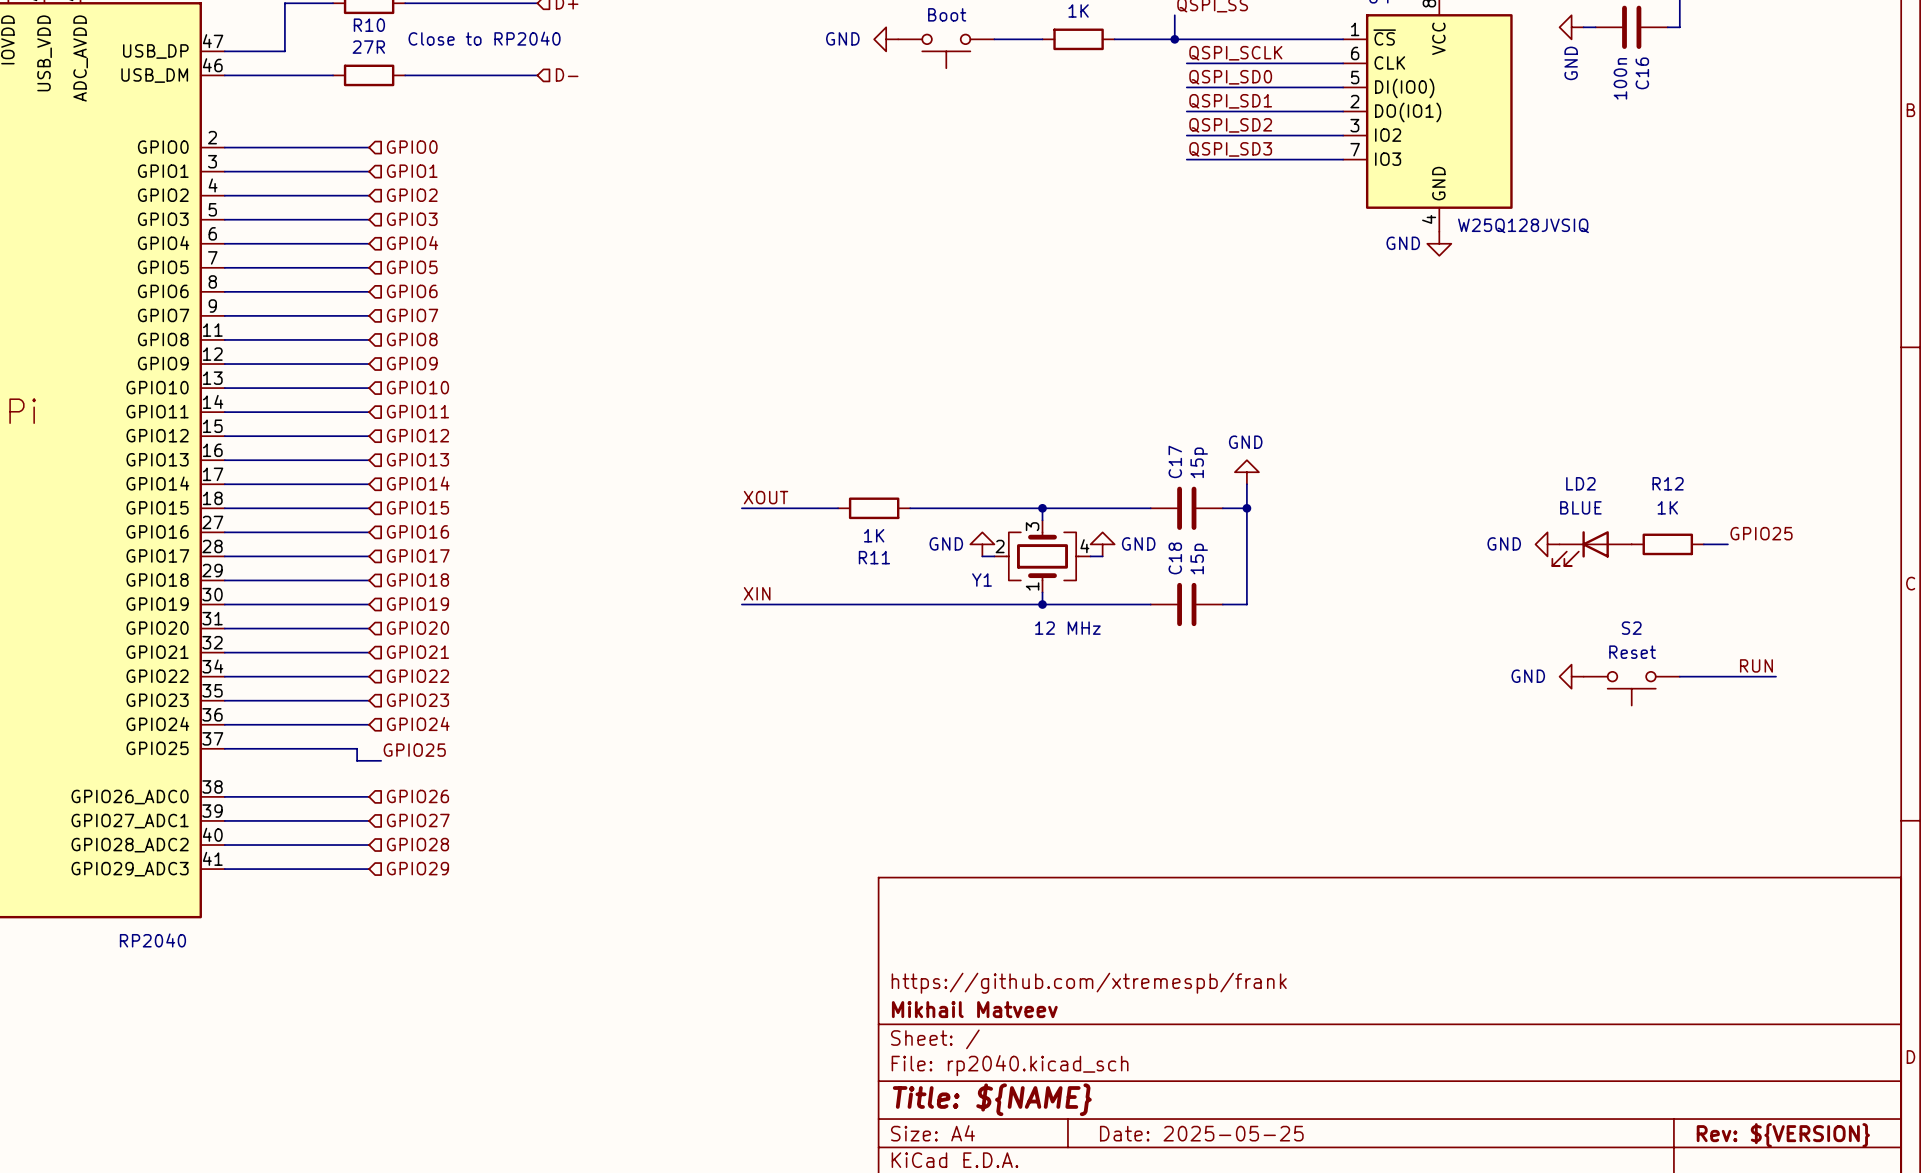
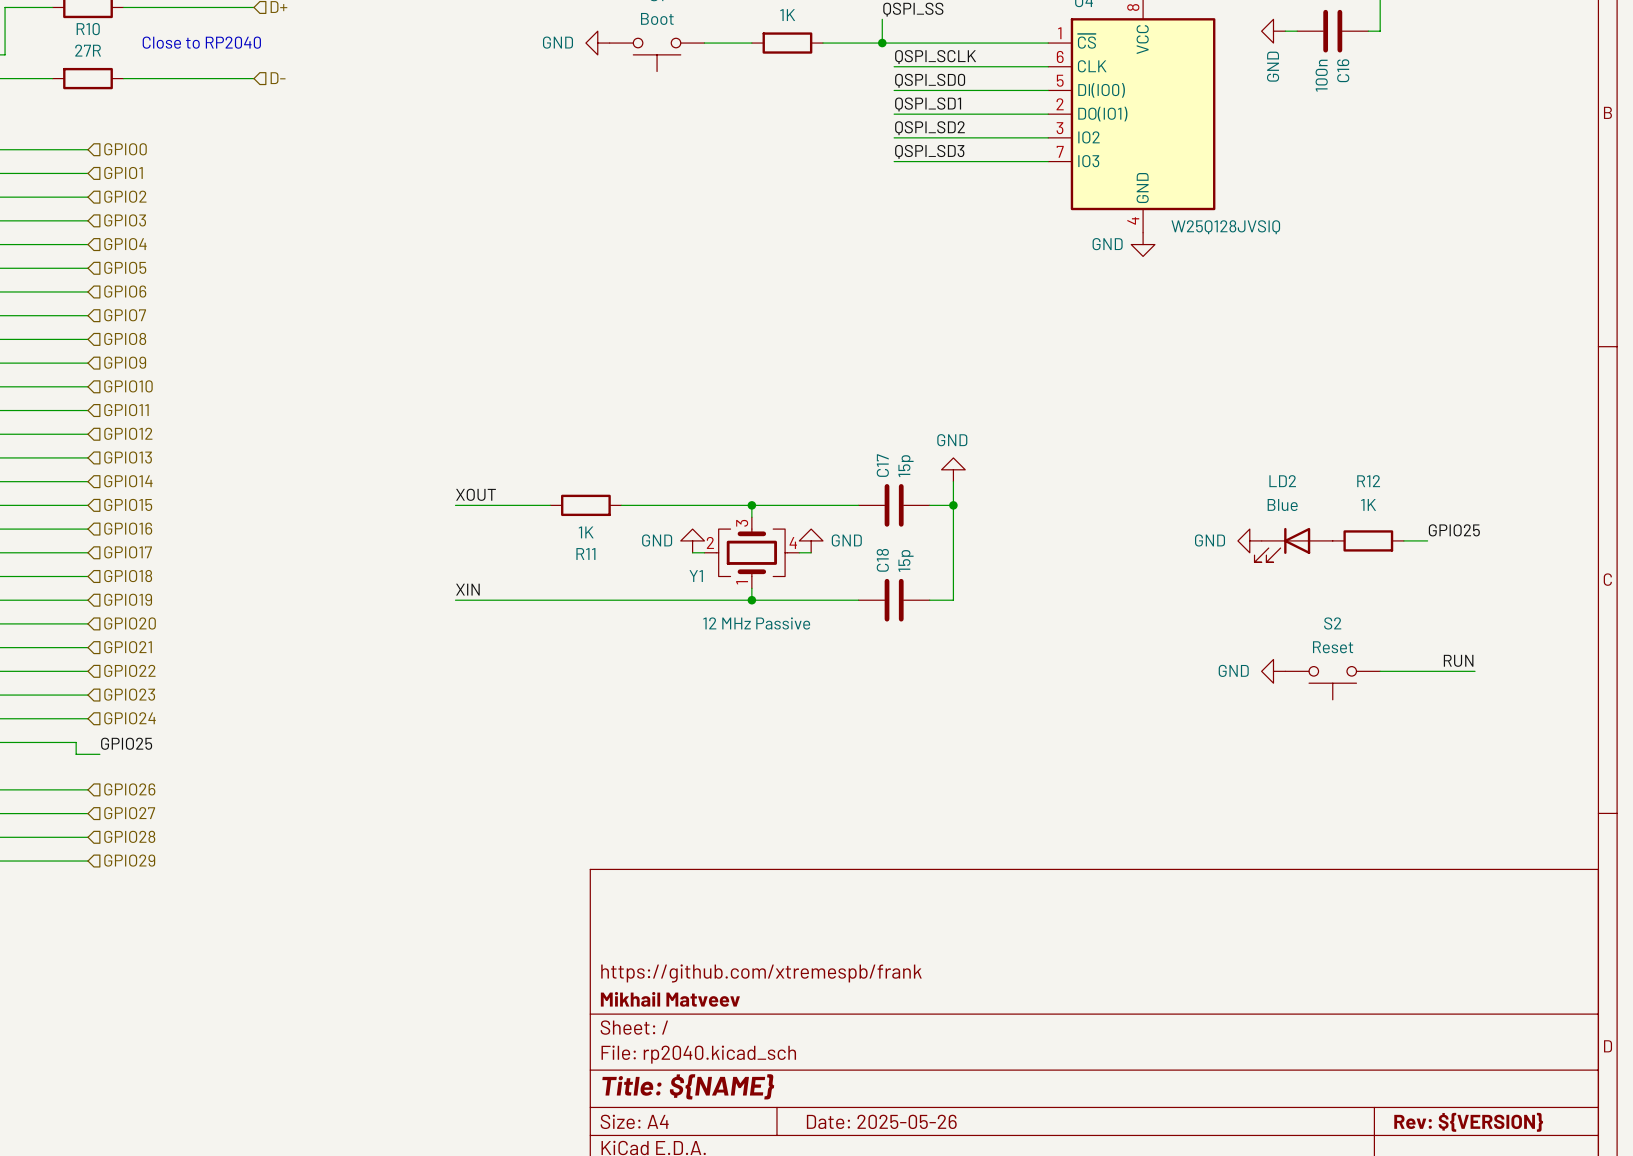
LD2 value: BLUE (1580, 507) -> Blue (1282, 505)
Y1 value: 12 MHz (1067, 628) -> 12 MHz Passive (756, 623)
title block: Date: 2025-05-25 (1201, 1133) -> Date: 2025-05-26 (881, 1121)

